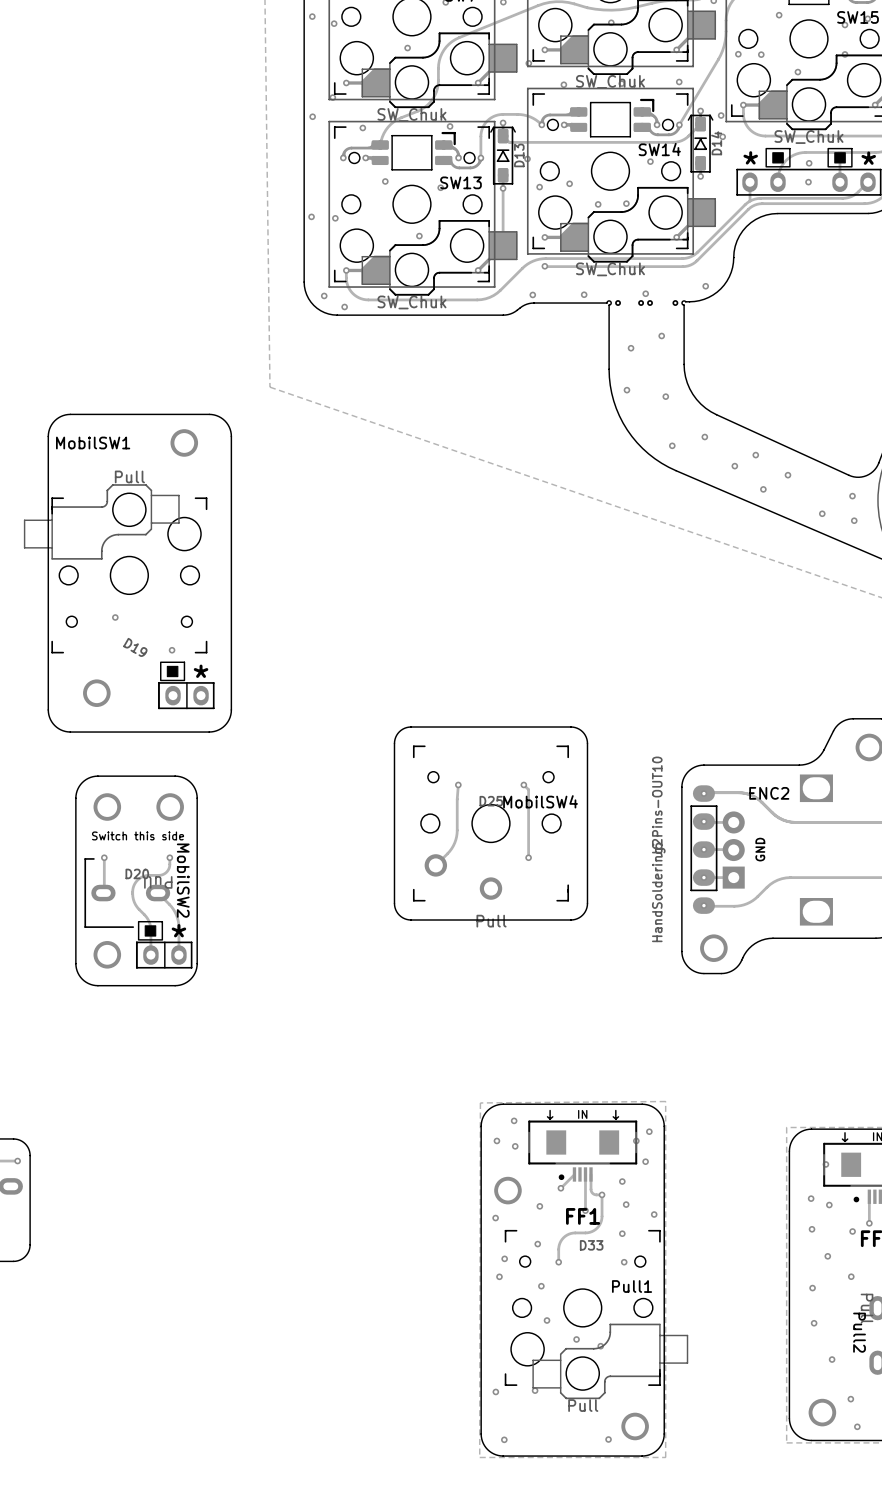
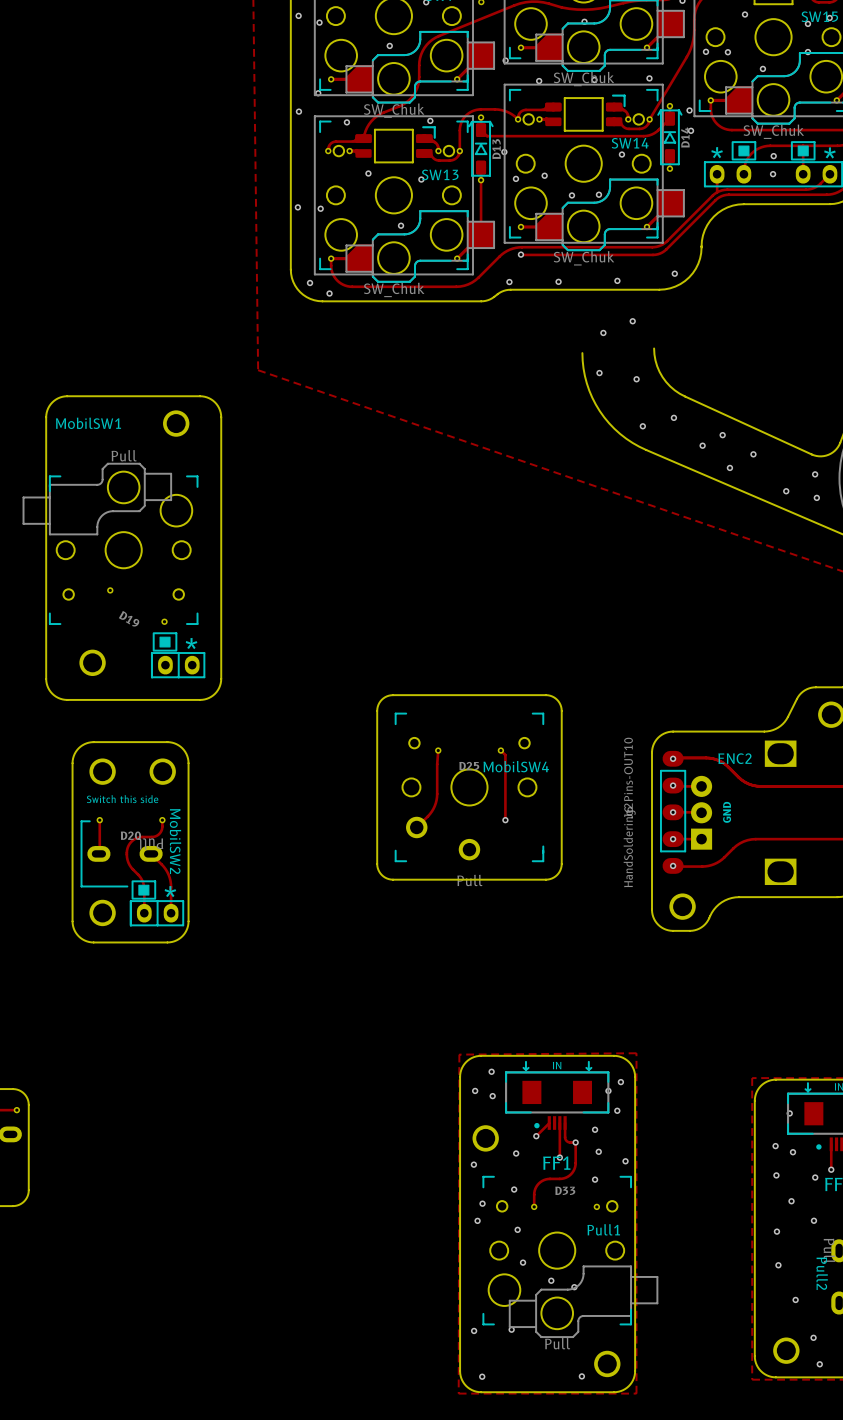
board edge: (733, 257) (729, 276) (717, 292) (699, 300) (682, 302) (684, 305) (684, 364) -> (701, 246) (700, 258) (695, 268) (685, 281) (675, 286) (659, 289) (580, 289)
round board edge: [615, 300, 621, 306] -> none
round board edge: [638, 300, 645, 306] -> none
round board edge: [647, 300, 653, 306] -> none
round board edge: [672, 300, 679, 306] -> none
board edge: (607, 303) (609, 300) (611, 303) (609, 305) (609, 369) -> none

